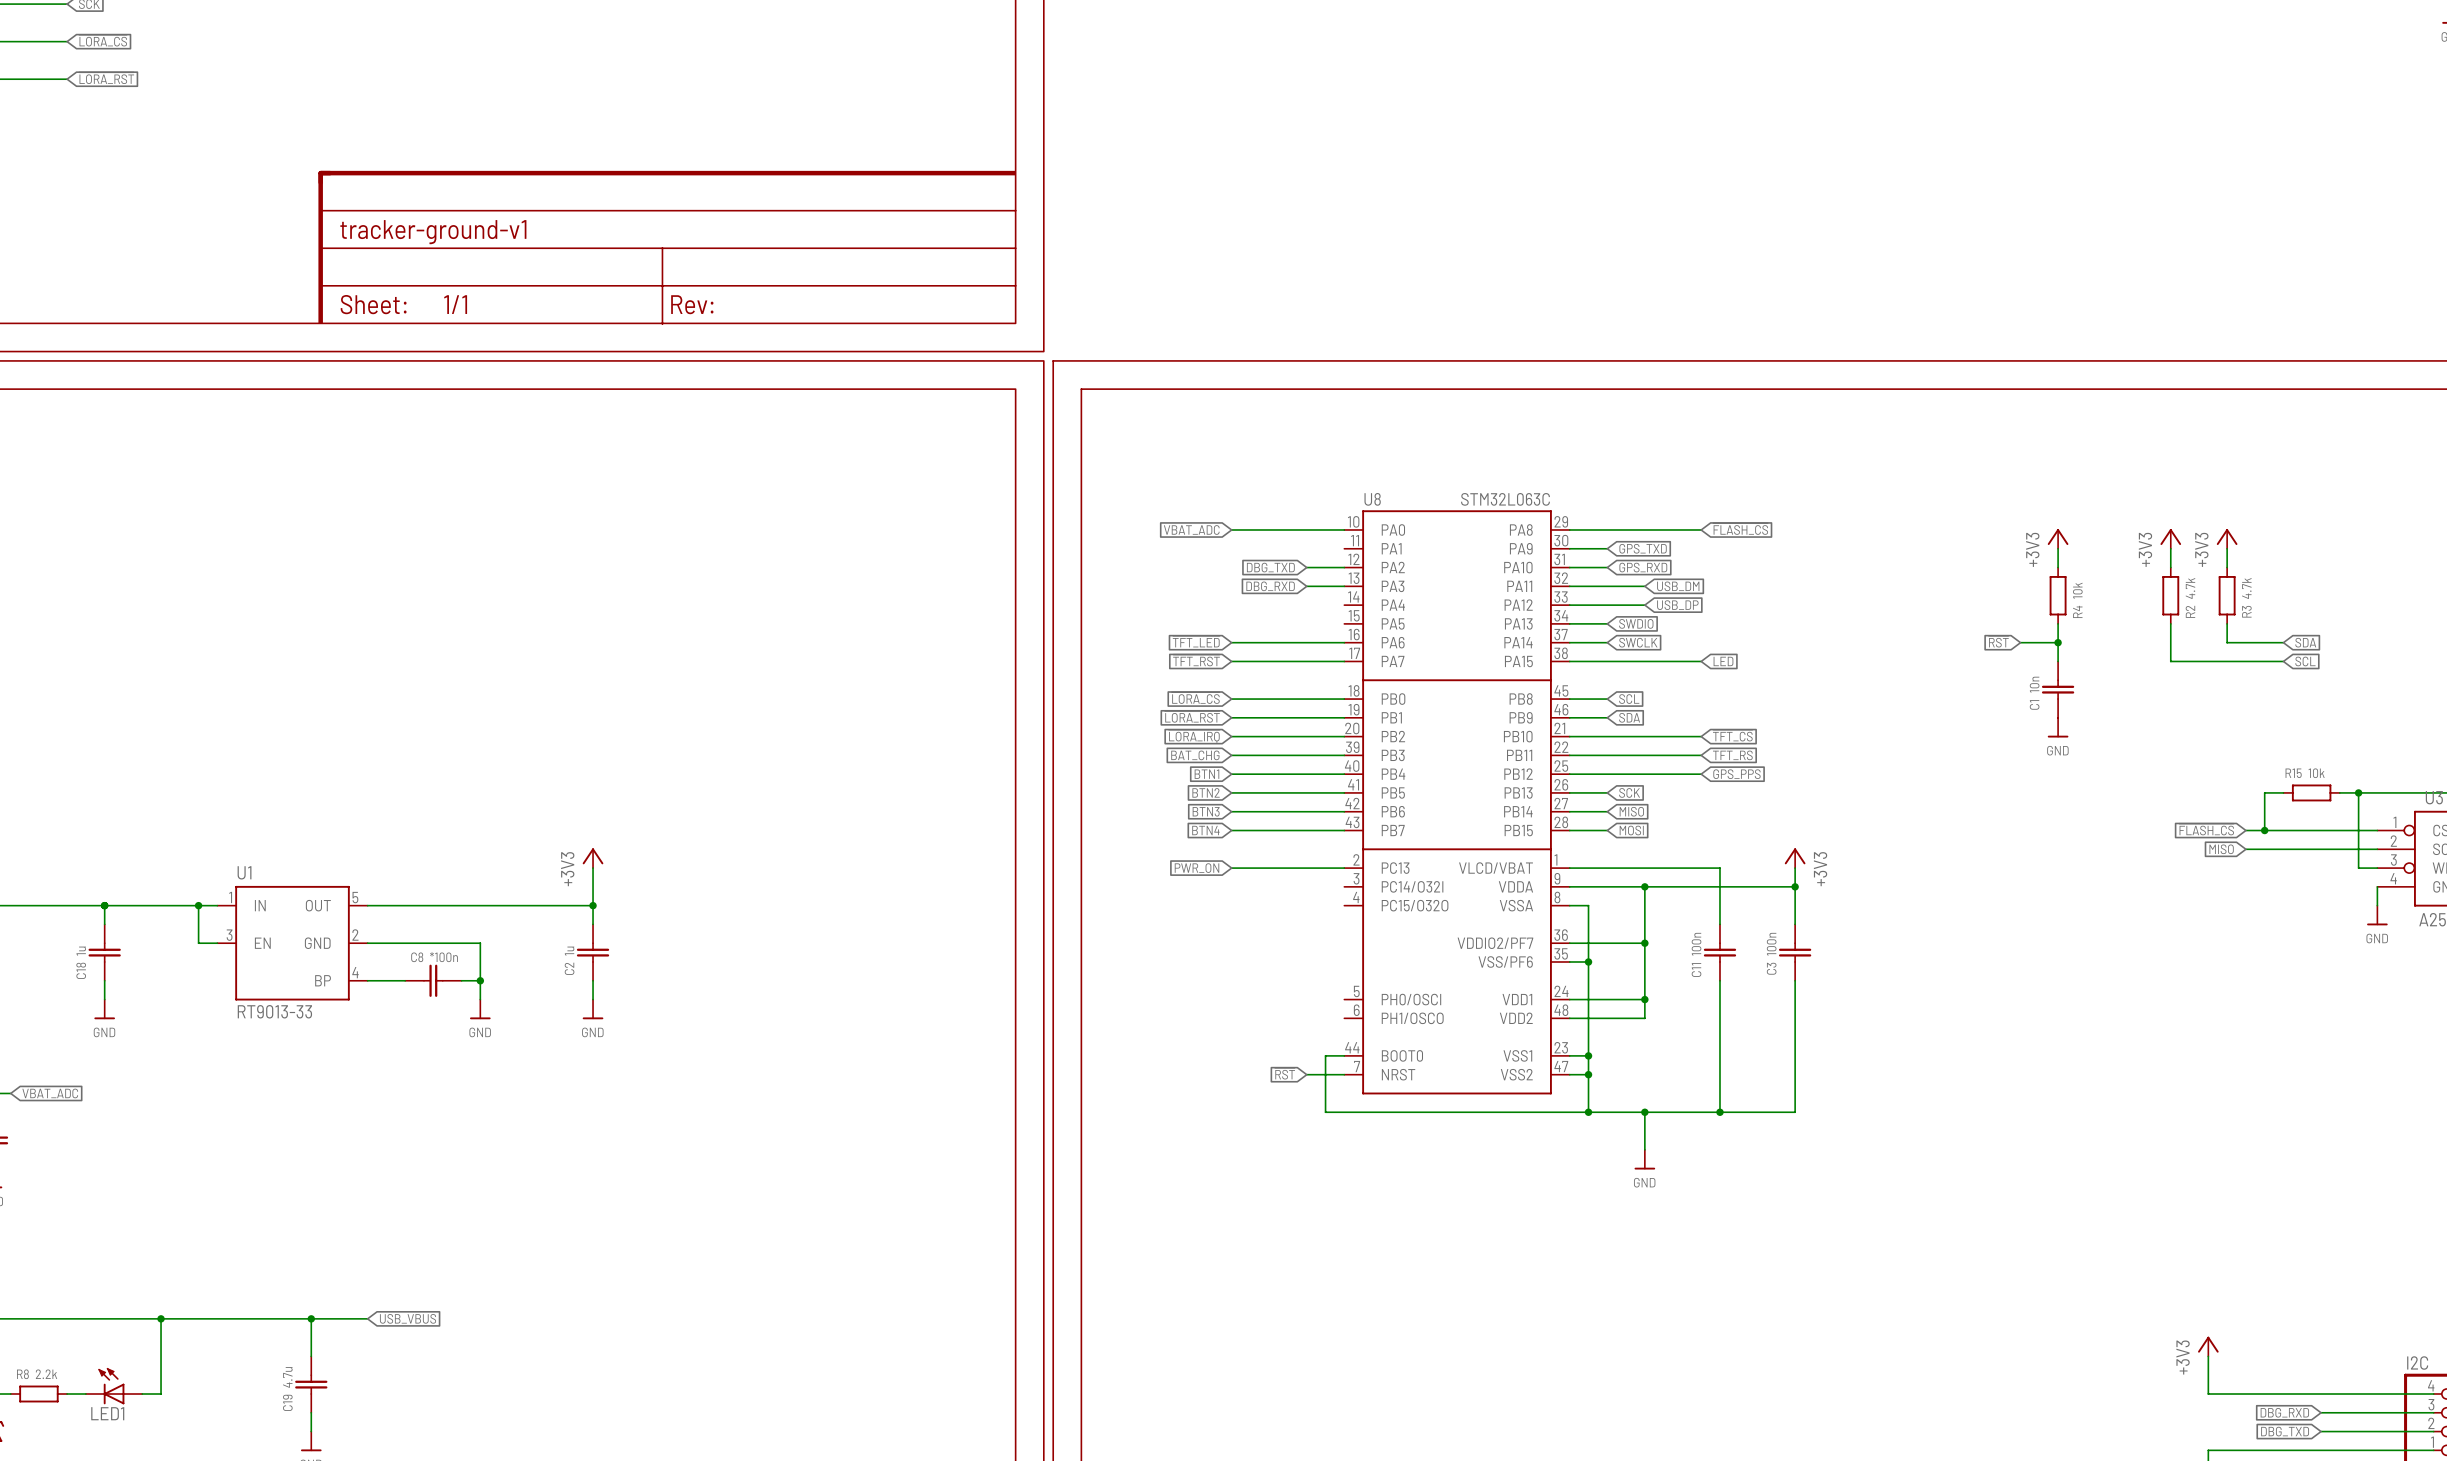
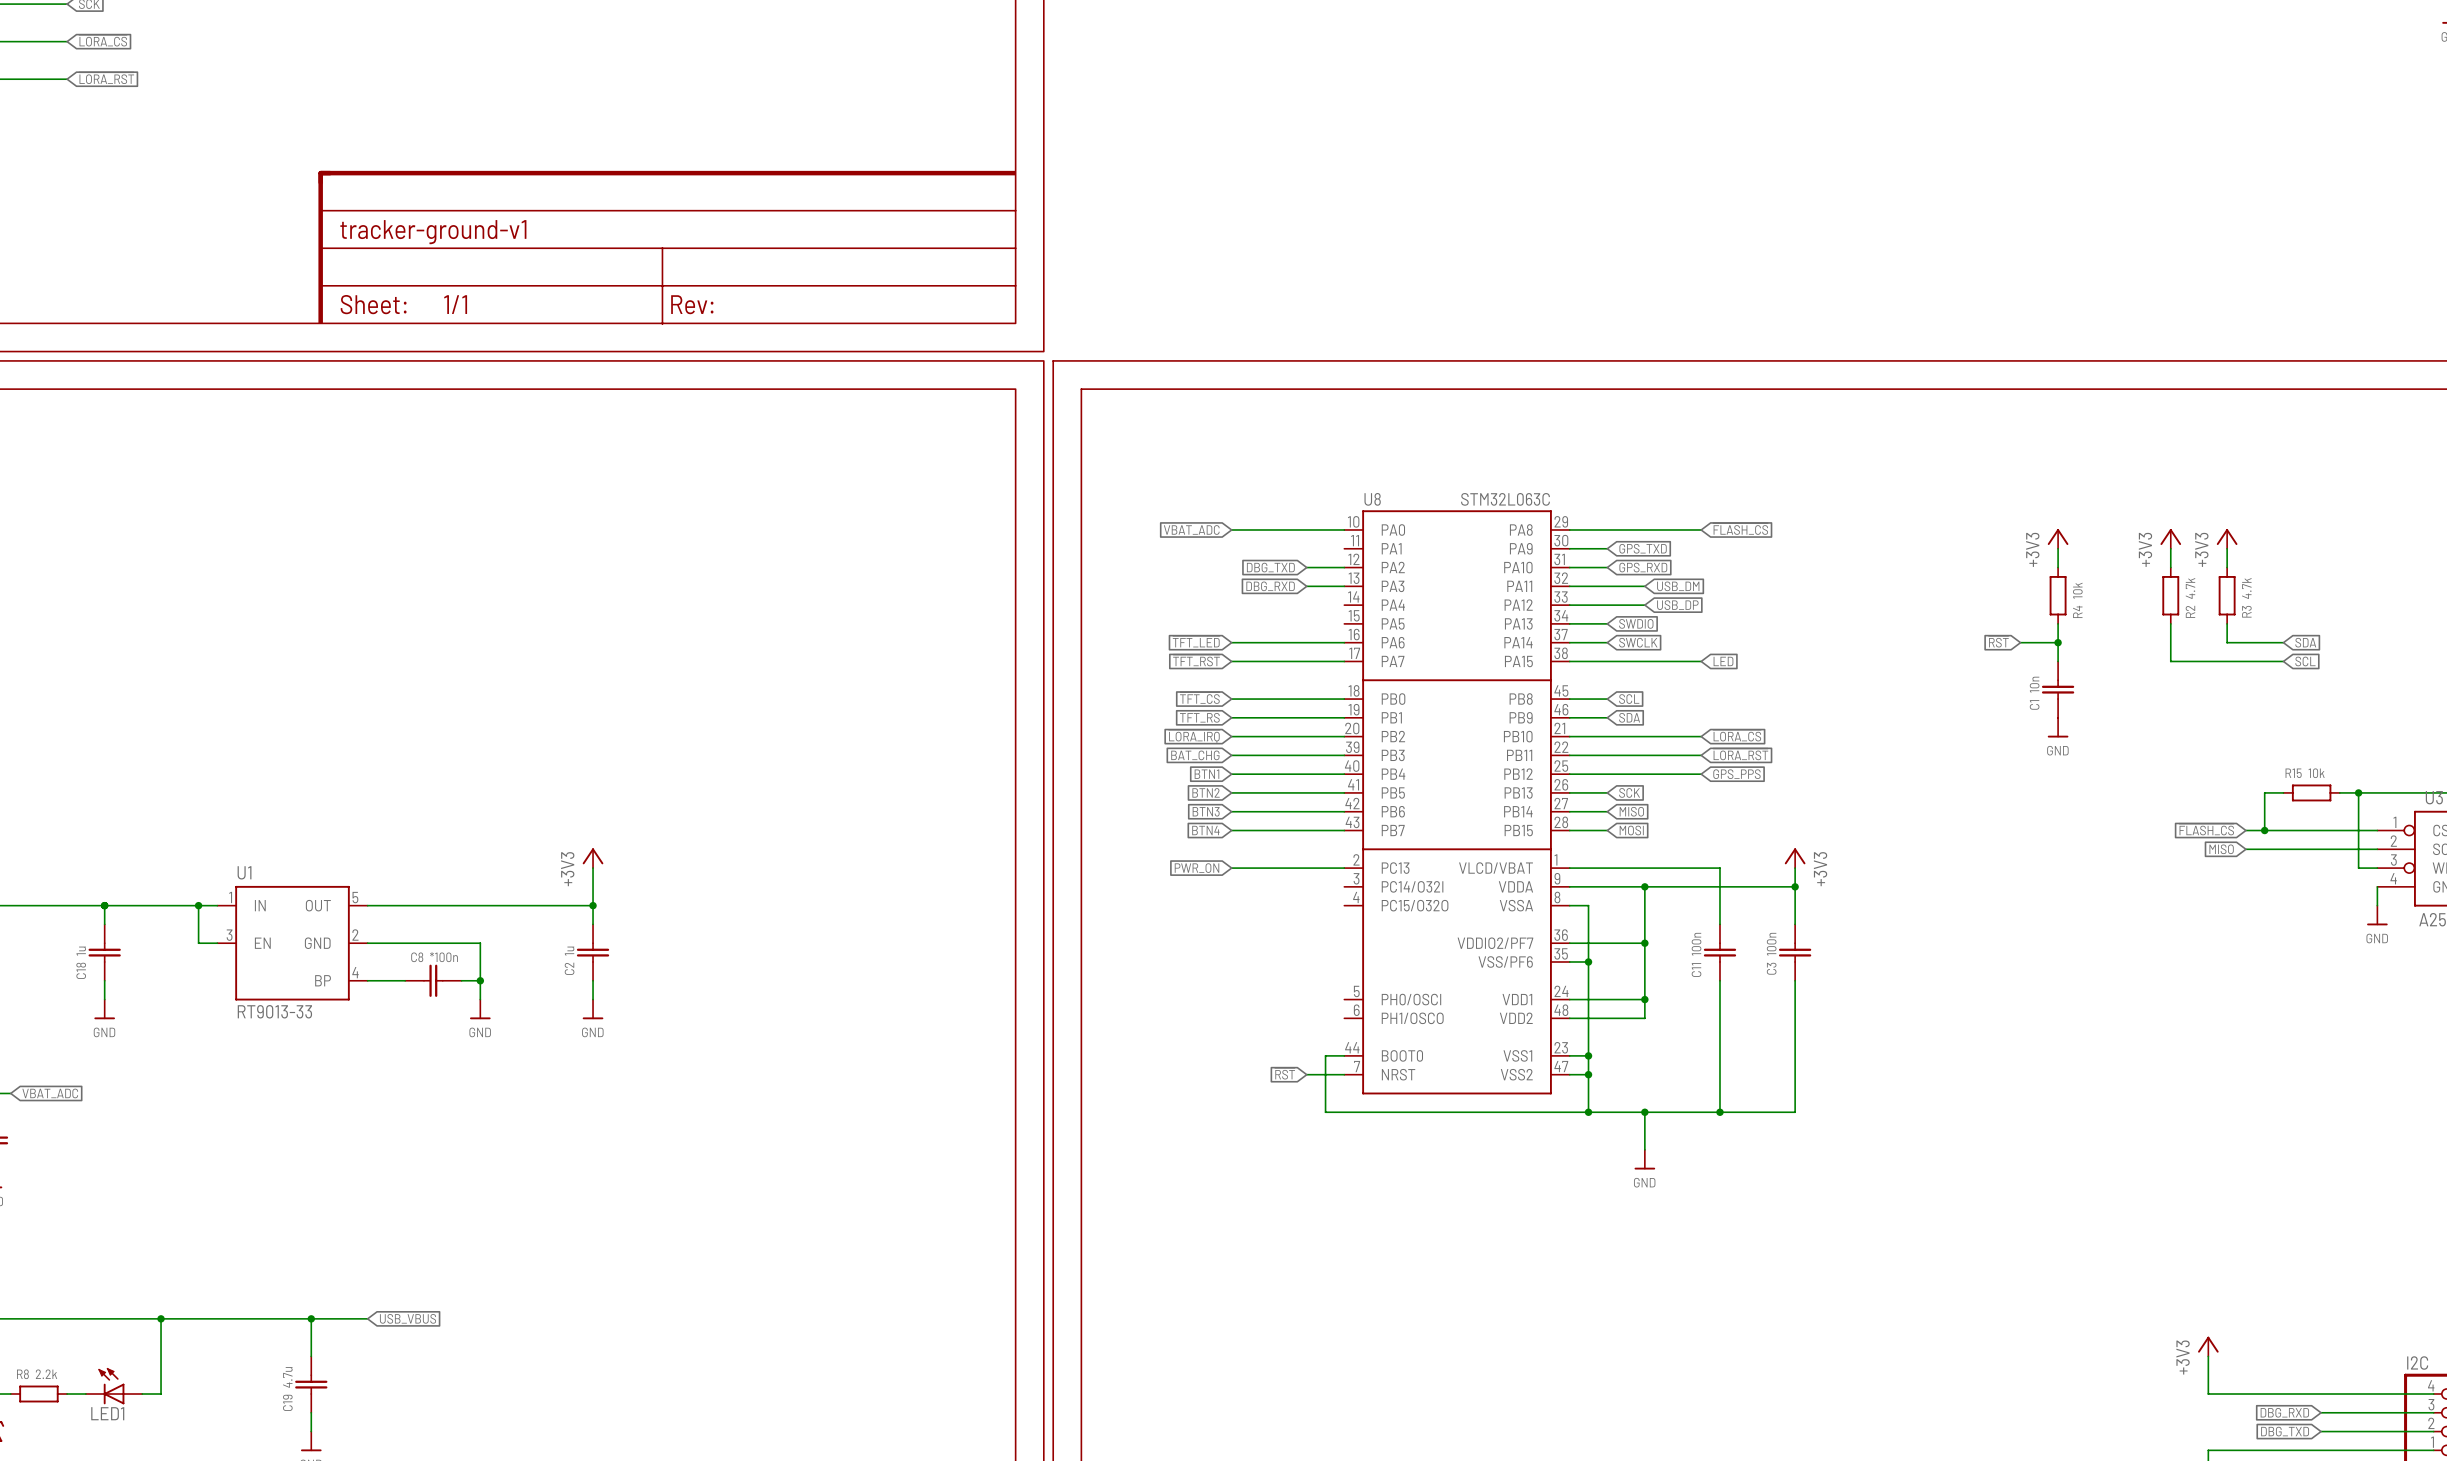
global label: ~{LORA_CS} (1195, 698) -> ~{TFT_CS} (1199, 698)
global label: ~{LORA_RST} (1192, 716) -> TFT_RS (1199, 717)
global label: ~{TFT_CS} (1732, 735) -> ~{LORA_CS} (1737, 735)
global label: TFT_RS (1732, 755) -> ~{LORA_RST} (1740, 754)

